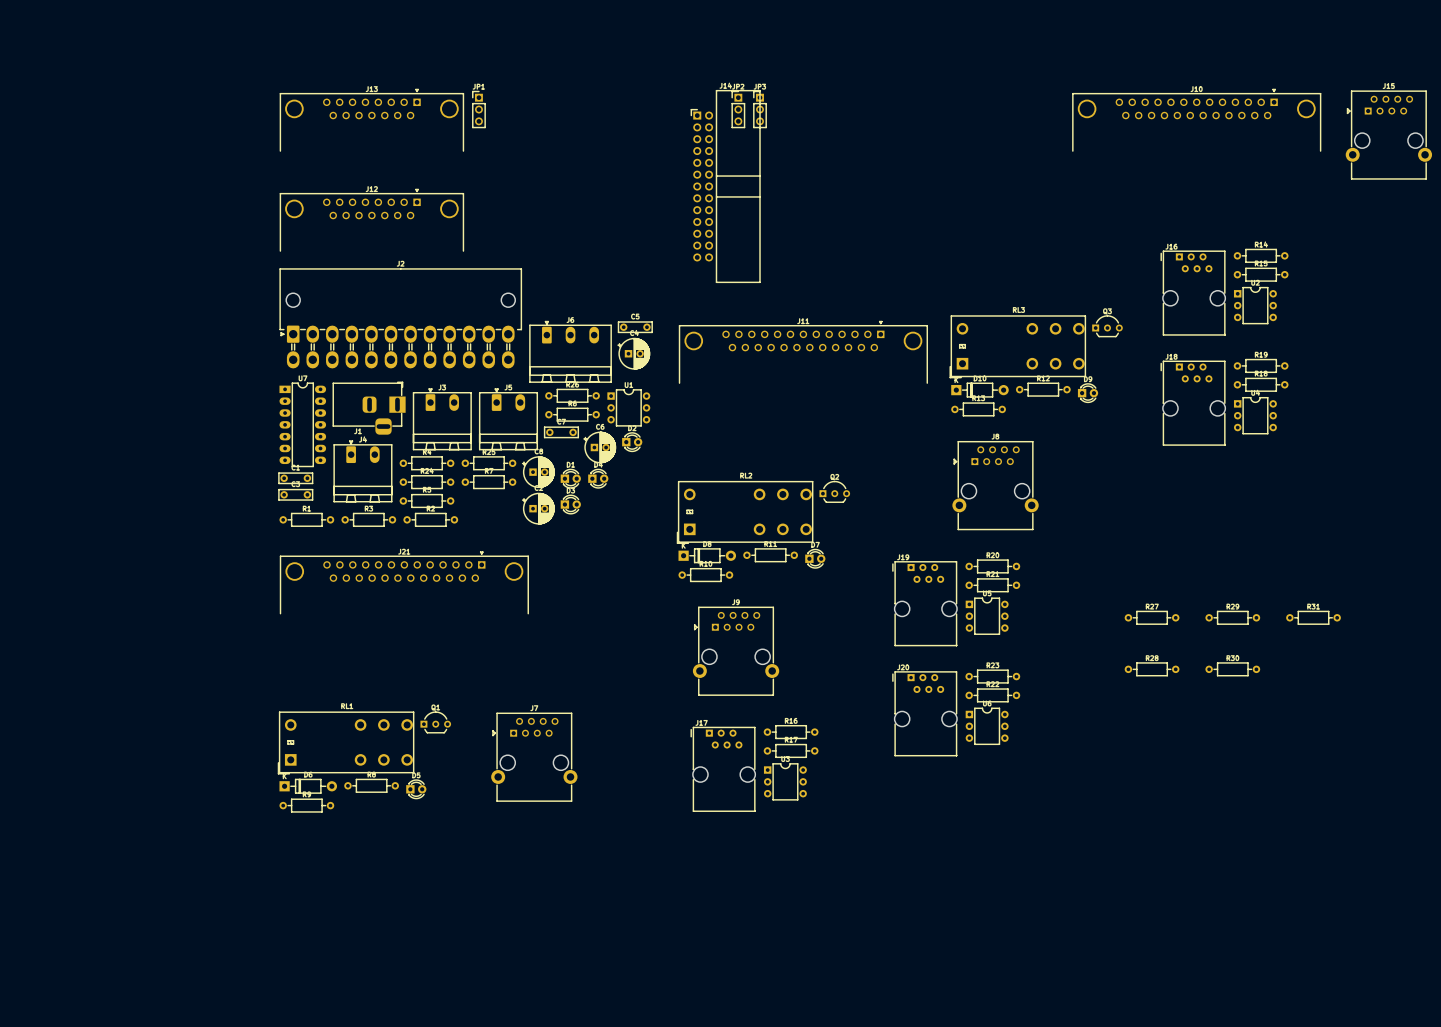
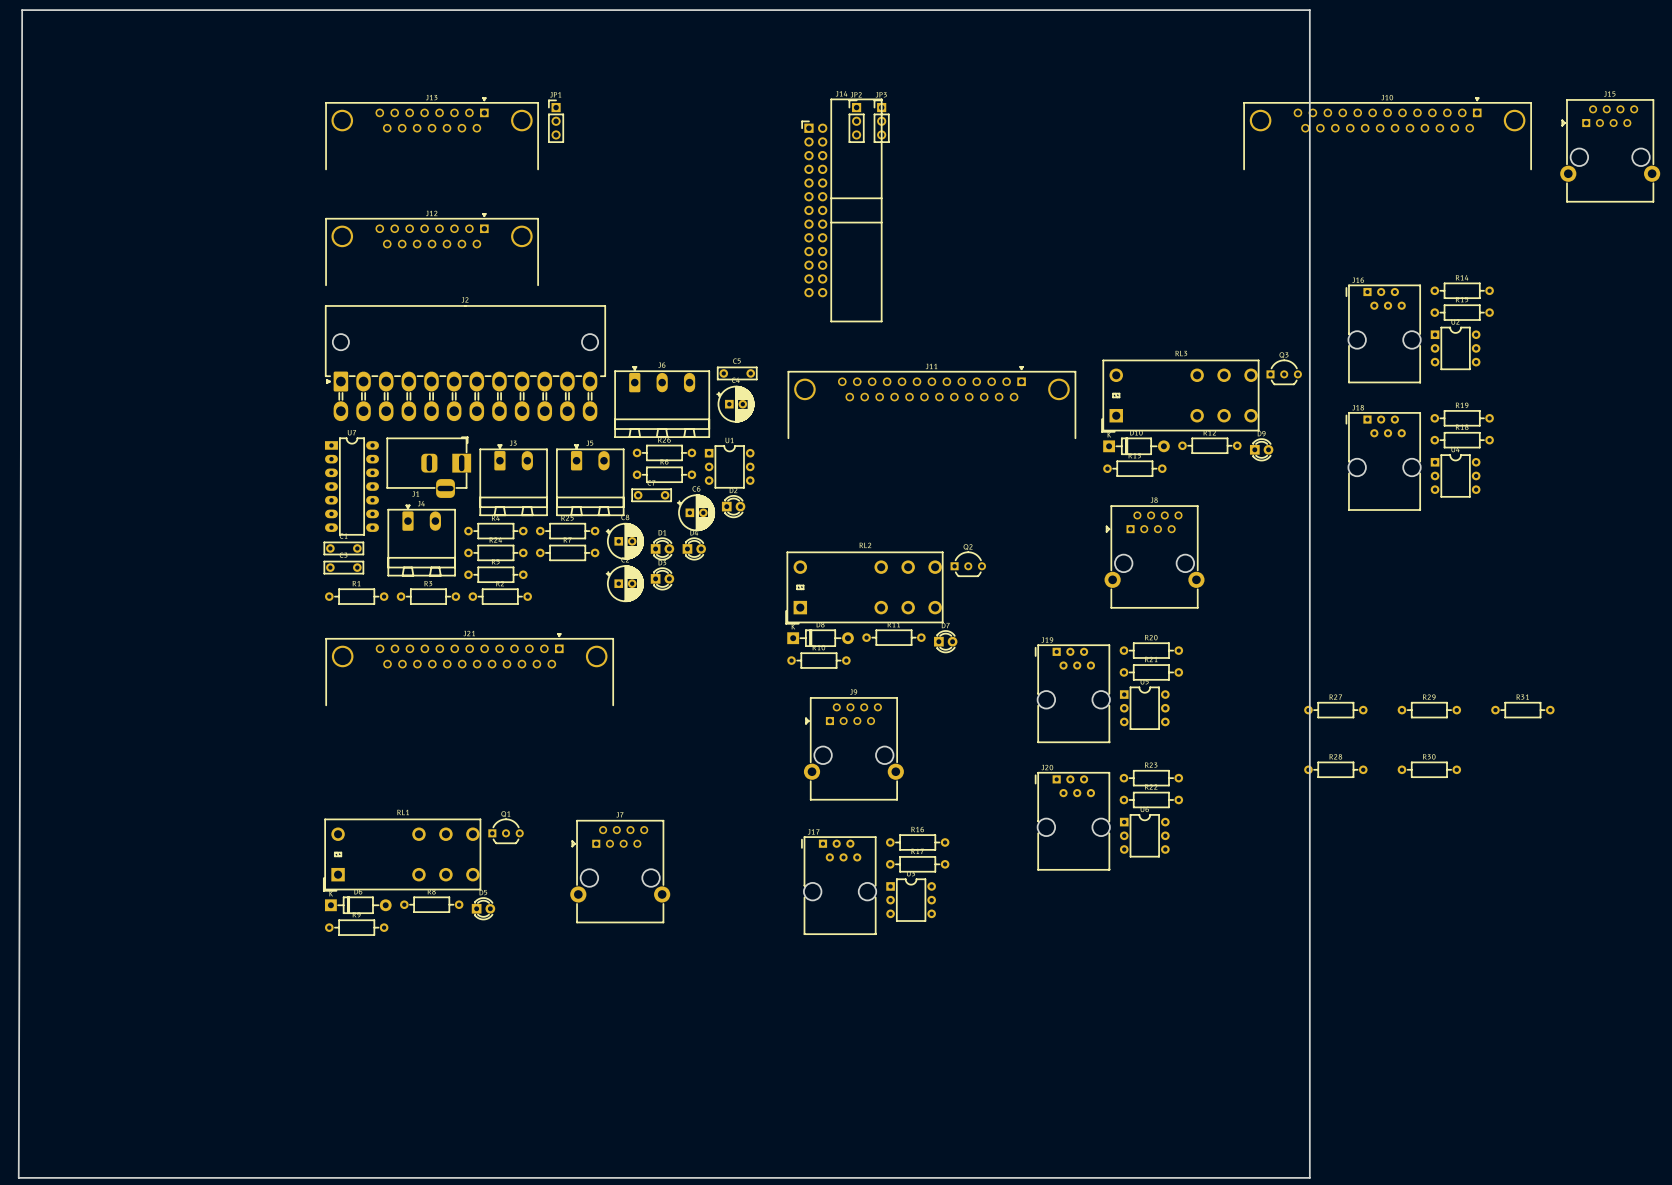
board edge: none -> (22, 10) (1309, 10) (1309, 1177) (18, 1177) (22, 10)

